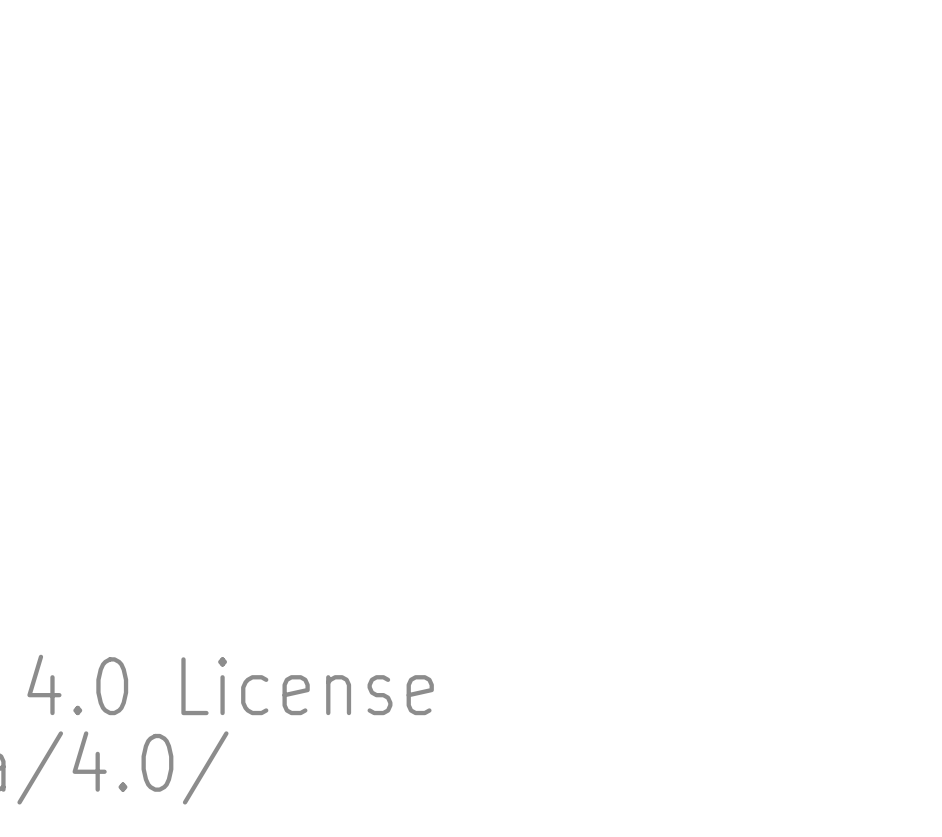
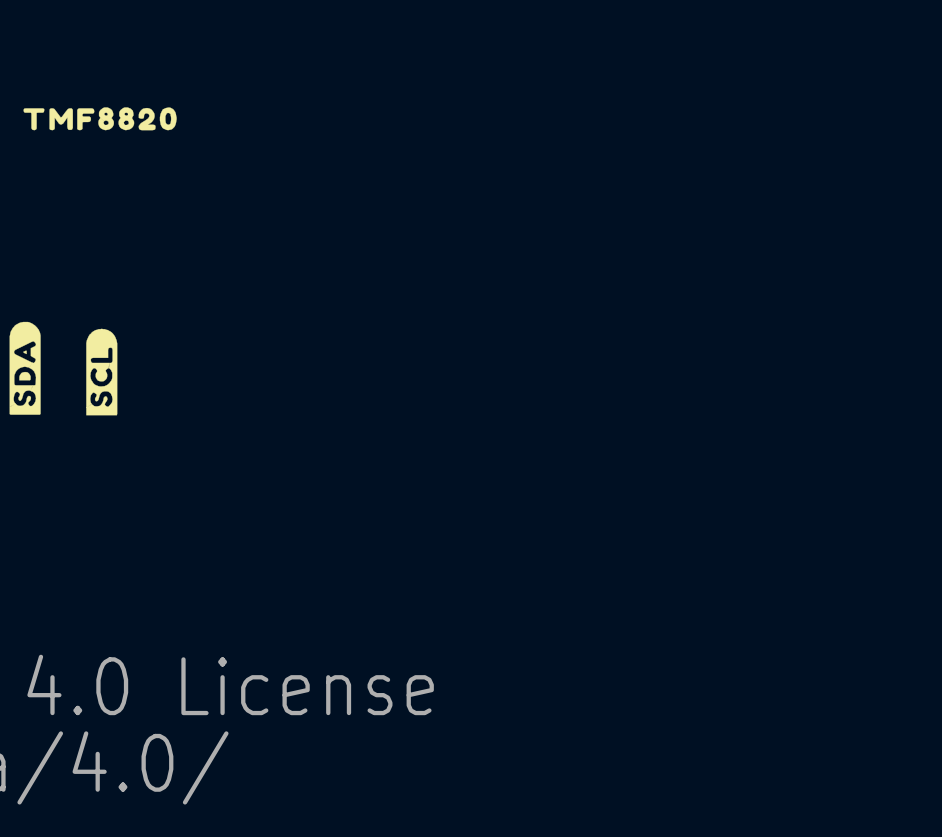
drawing: none -> [23, 107, 177, 131]
drawing: none -> [9, 321, 41, 415]
drawing: none -> [86, 328, 118, 416]

